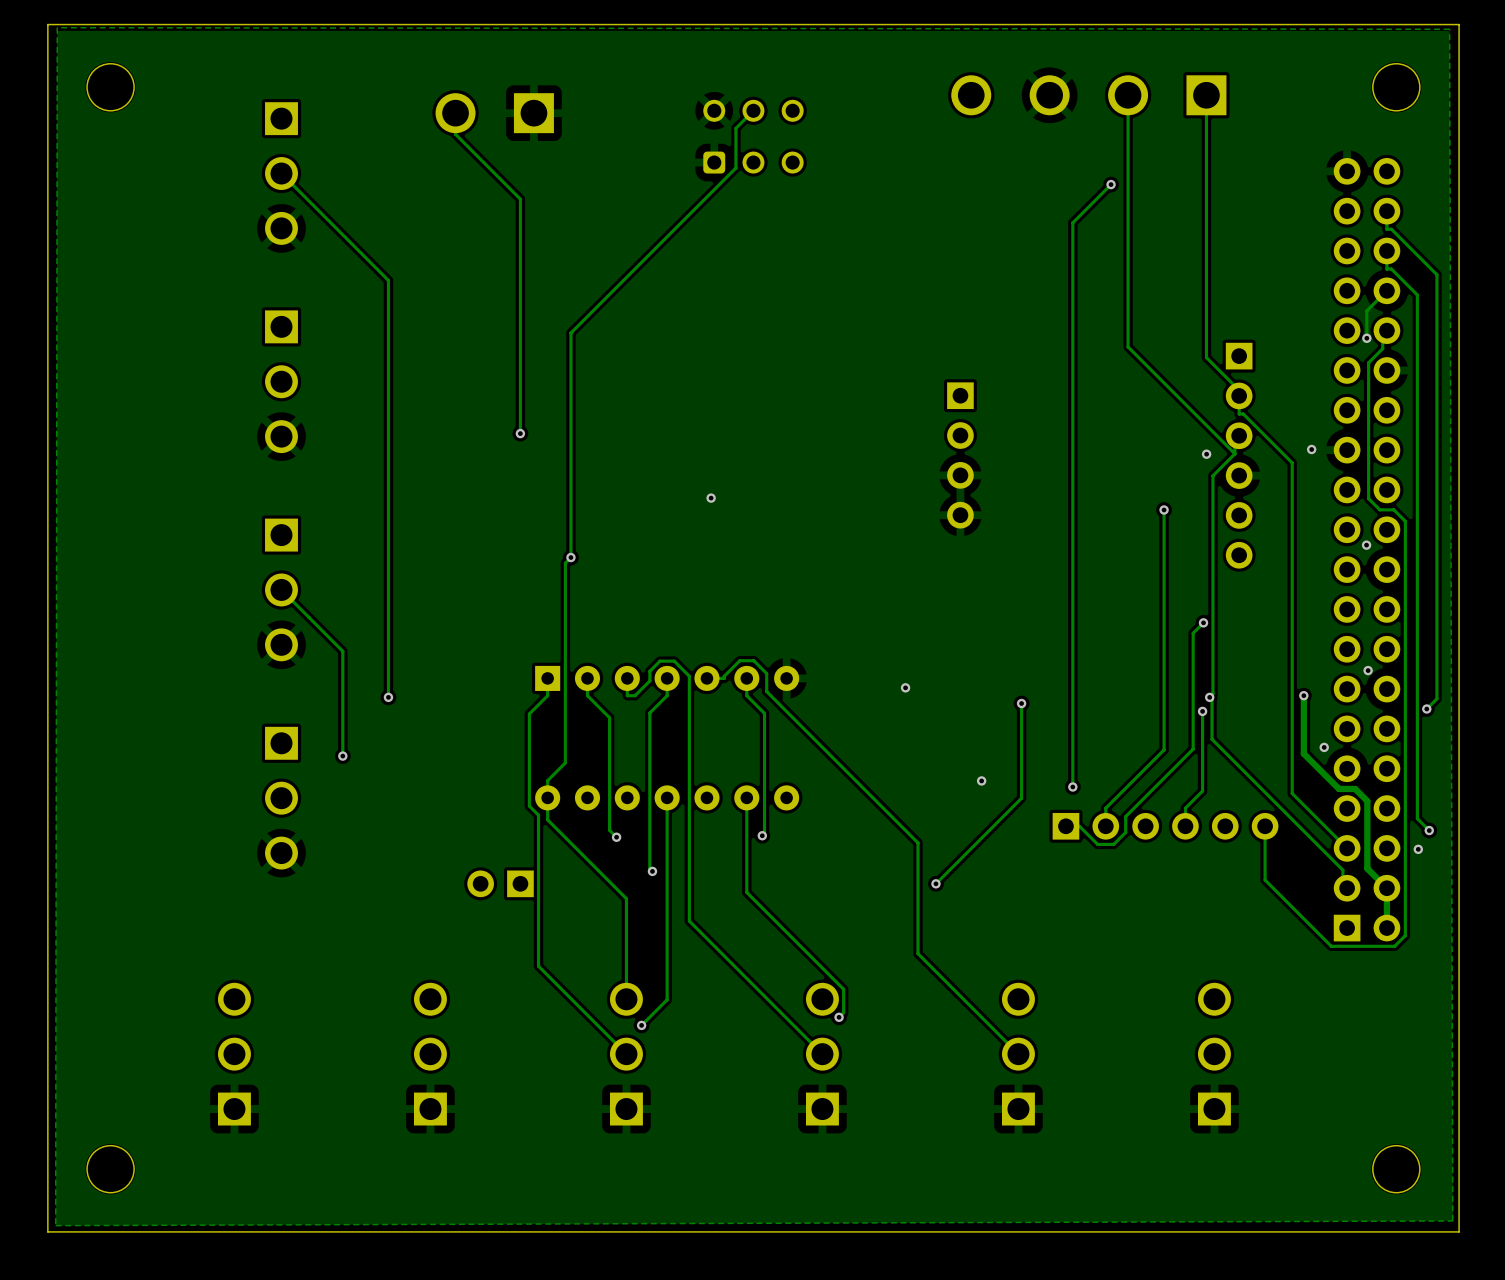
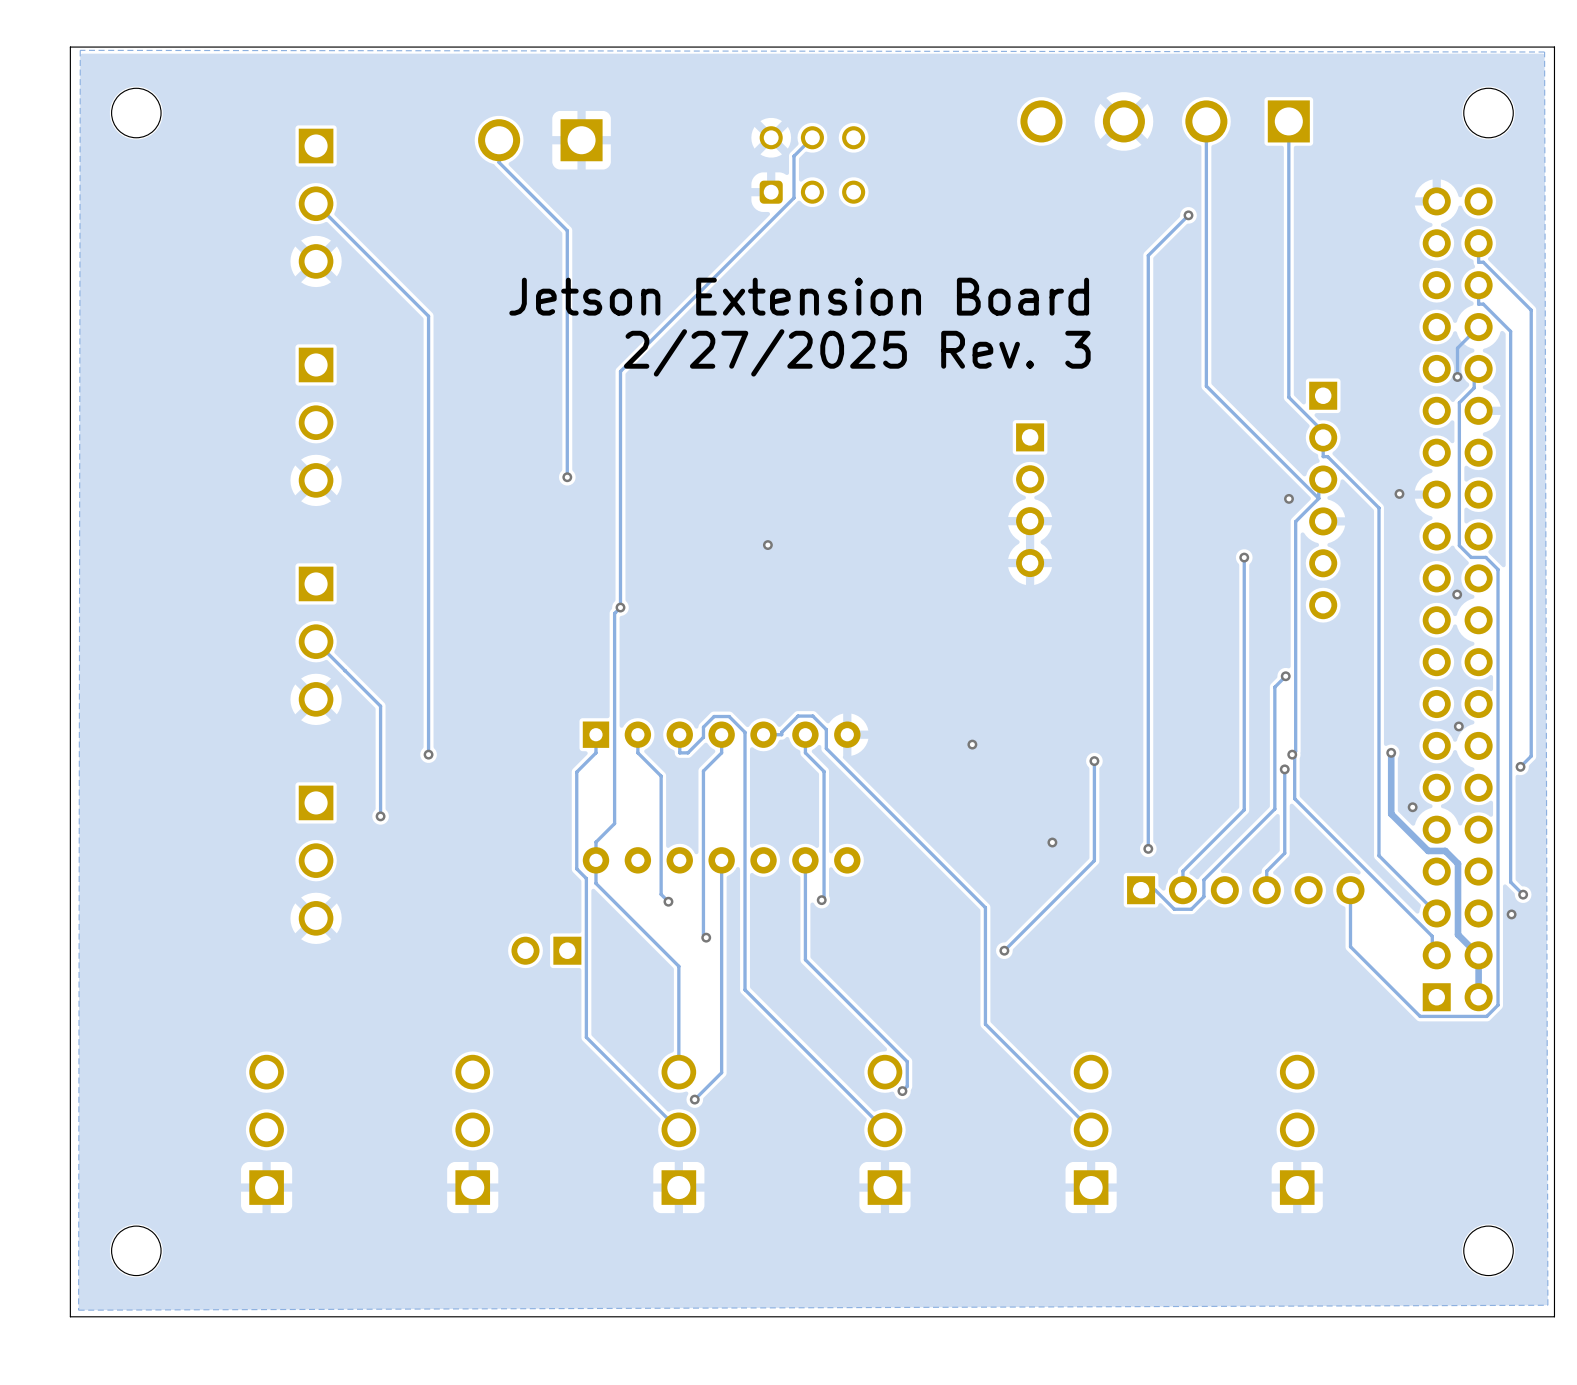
text: none -> Jetson Extension Board (799, 296)
text: none -> 2/27/2025 Rev. 3 (857, 352)

